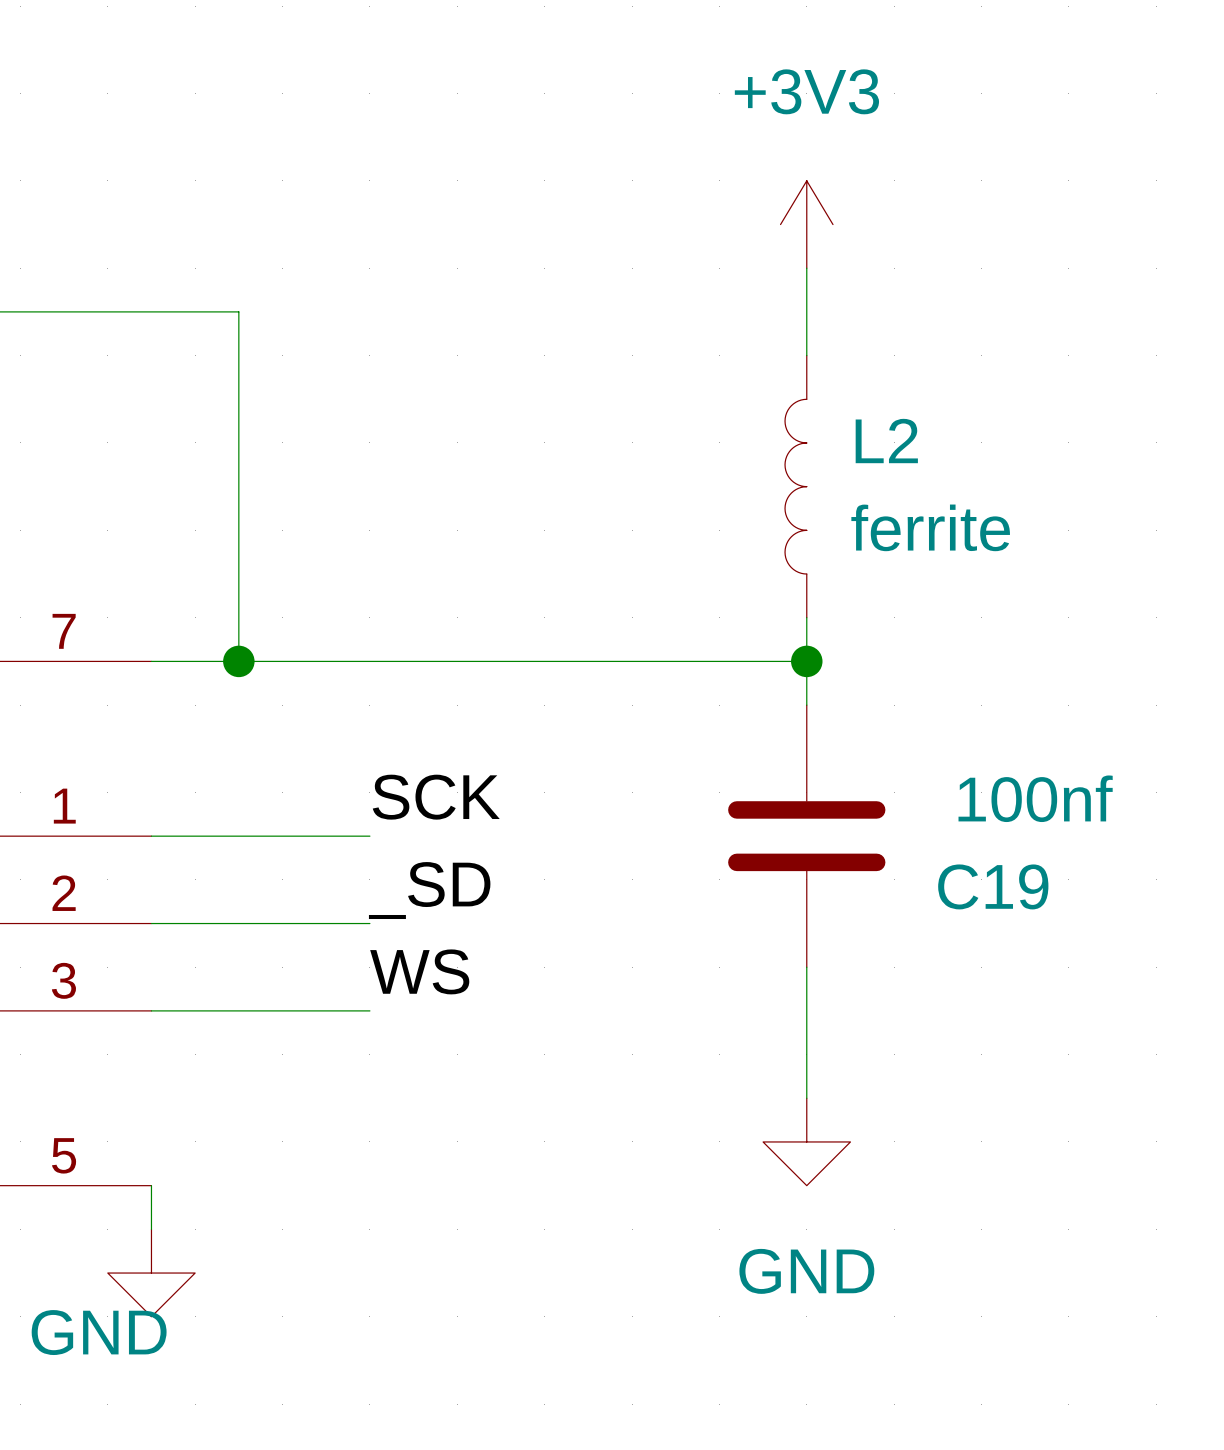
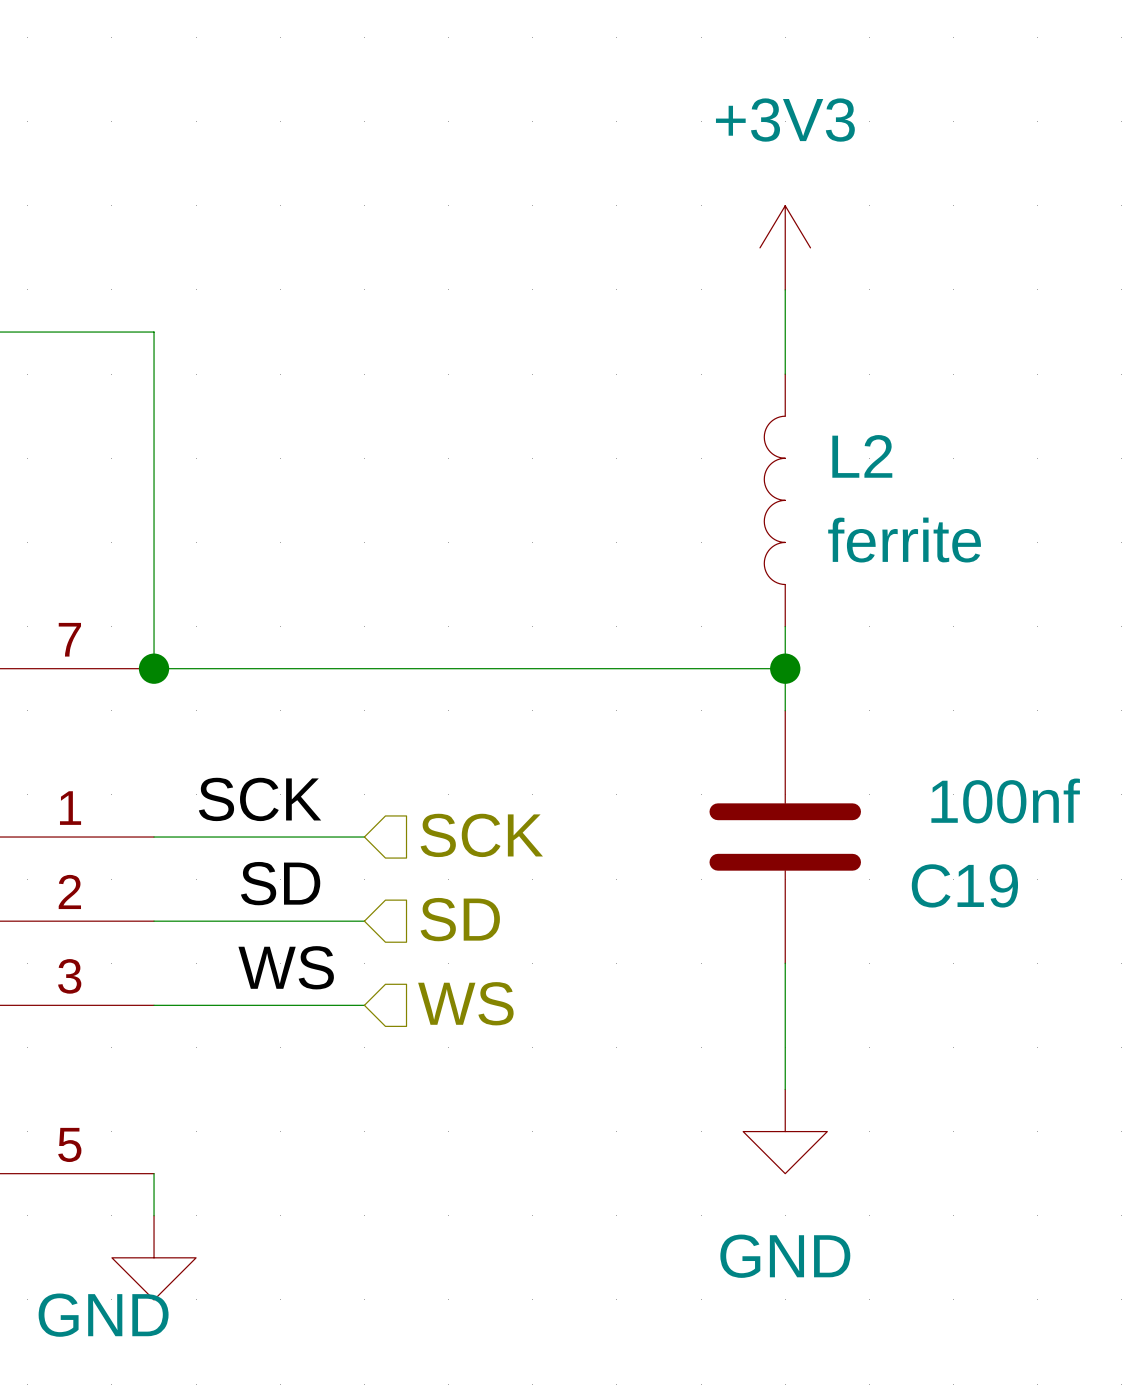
wire: (151, 311) (238, 311) (238, 661) -> (154, 332) (154, 668)
junction position: (238, 661) -> (154, 668)
label position: SCK (436, 797) -> SCK (260, 799)
hierarchical label: none -> SCK (481, 835)
label: none -> SD (280, 883)
label: _SD (429, 890) -> none
hierarchical label: none -> SD (460, 919)
label position: WS (419, 971) -> WS (286, 967)
hierarchical label: none -> WS (465, 1003)

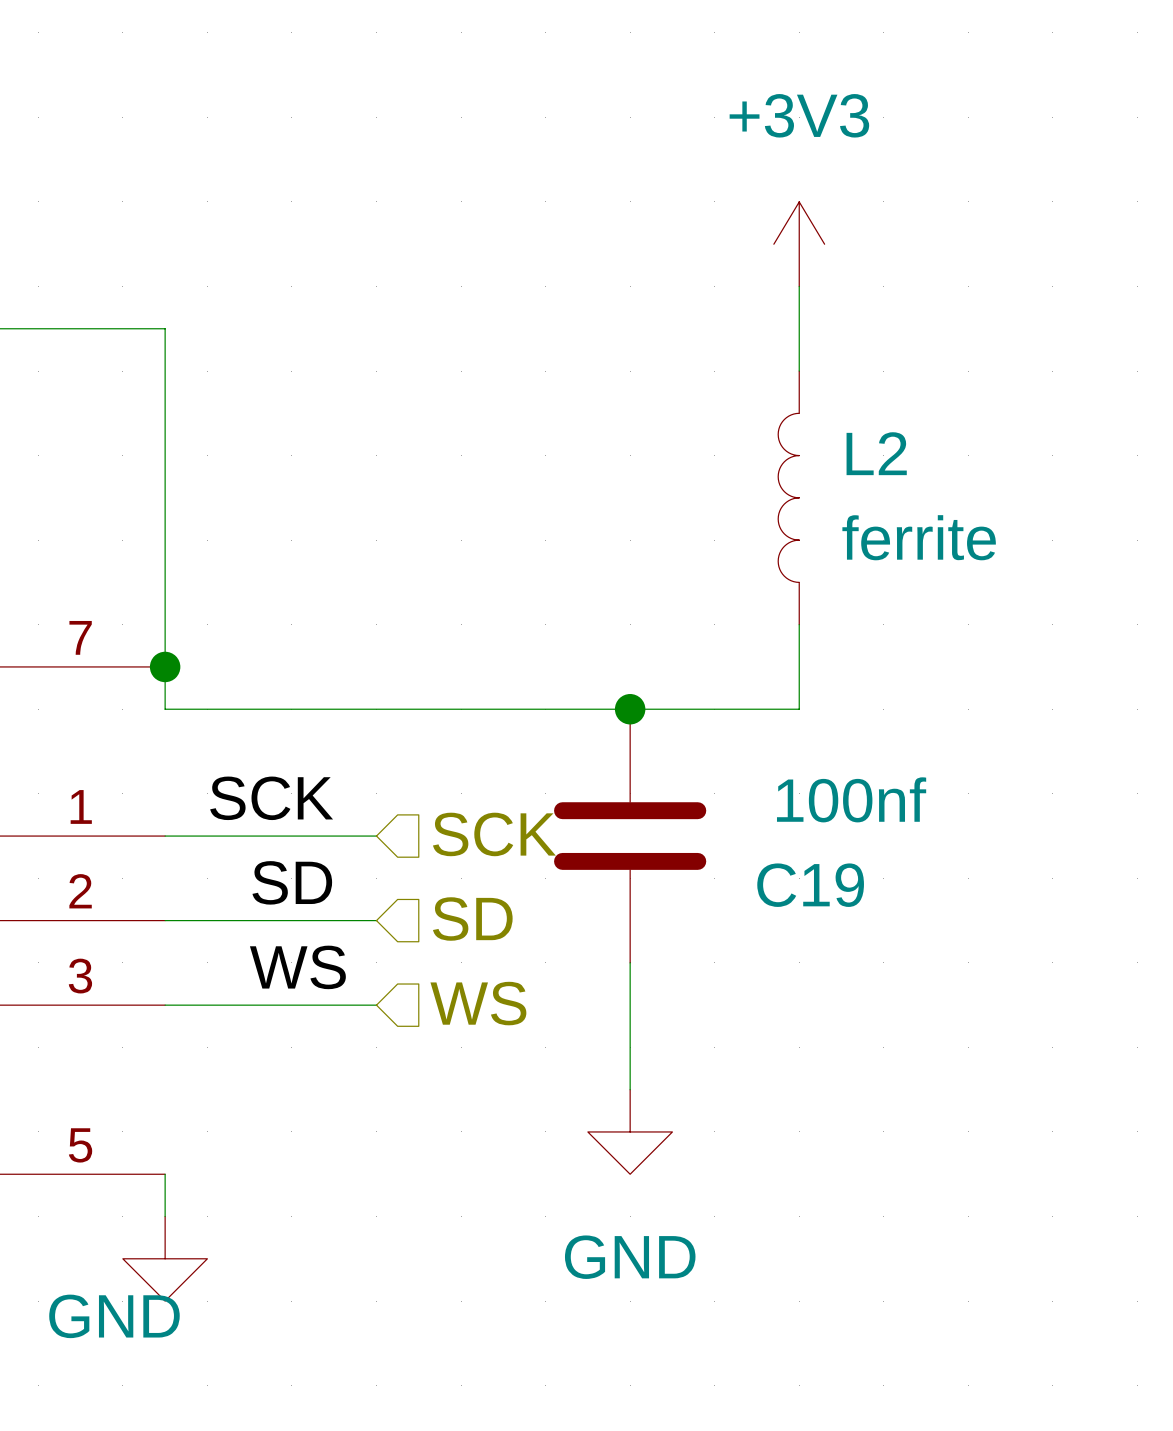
wire: (154, 668) (785, 668) -> (165, 666) (165, 709) (799, 709)
junction position: (785, 668) -> (630, 709)
C19 position: (785, 837) -> (630, 836)
wire: (785, 963) (785, 1089) -> (630, 962) (630, 1089)
power symbol position: GND (785, 1131) -> GND (630, 1131)

